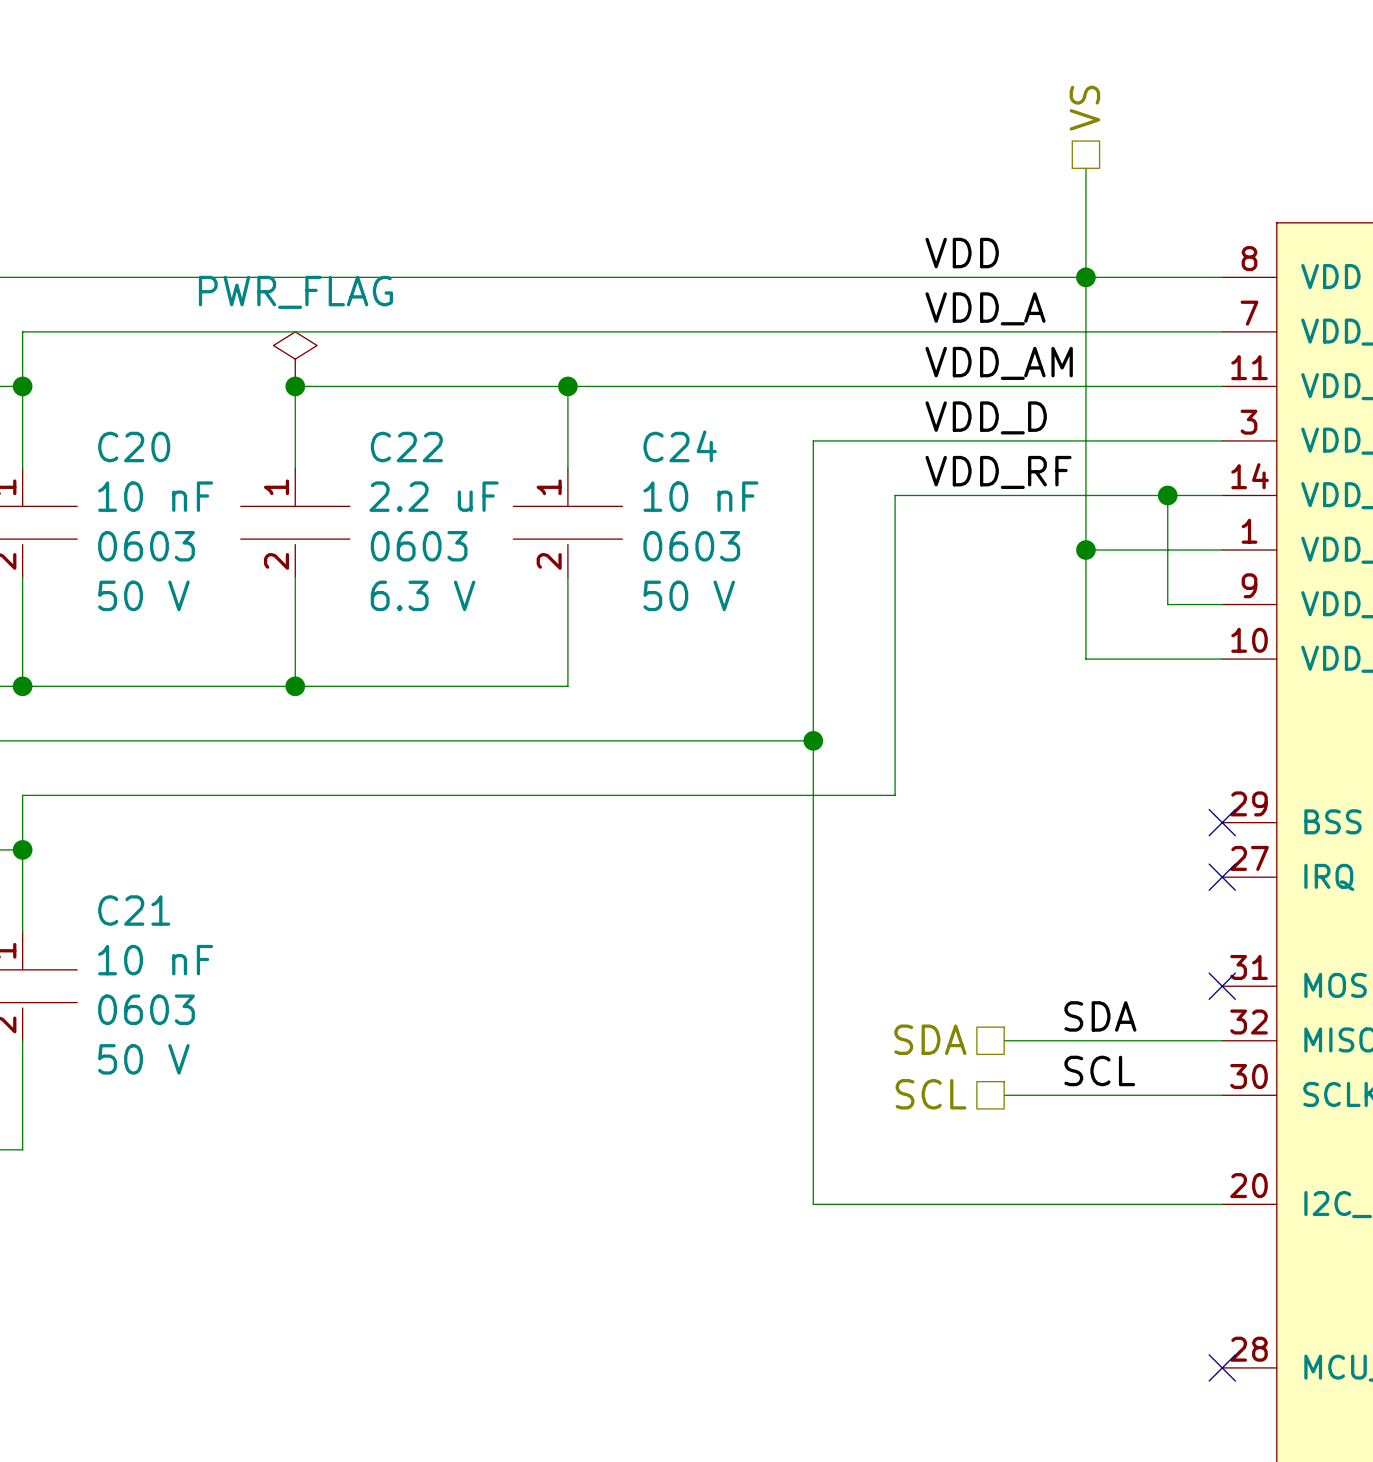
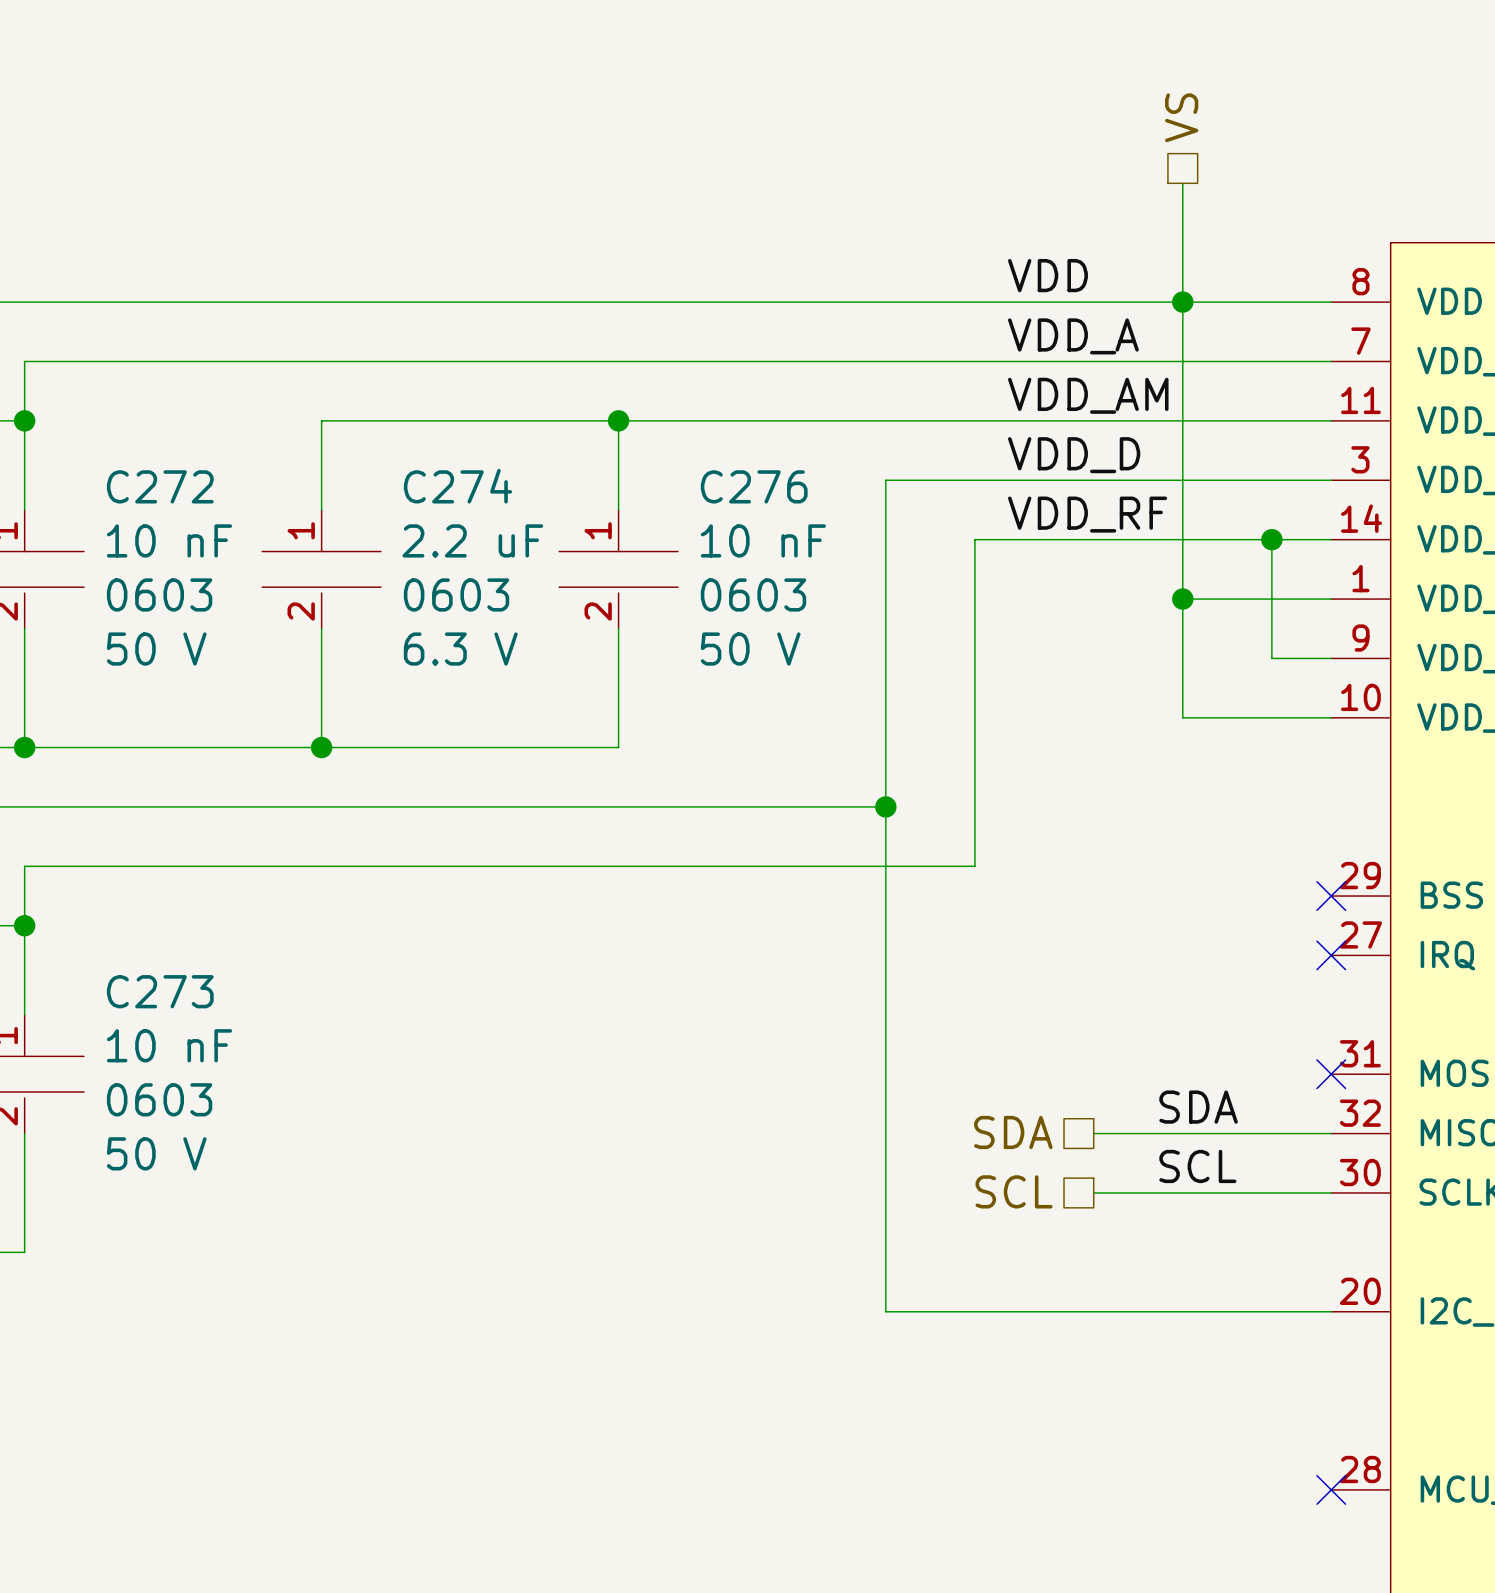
power symbol: PWR_FLAG (295, 359) -> none
junction: (295, 386) -> none
C24 name: C24 (680, 446) -> C276 (754, 486)
C20 name: C20 (134, 447) -> C272 (160, 486)
C22 name: C22 (406, 447) -> C274 (457, 486)
C21 name: C21 (134, 910) -> C273 (160, 991)

